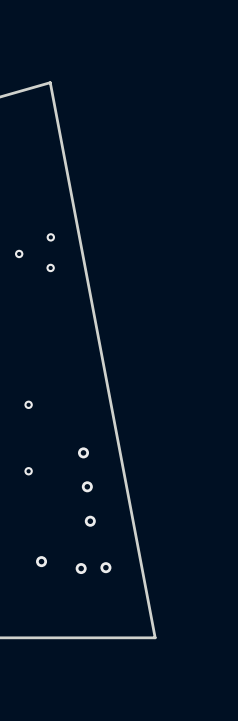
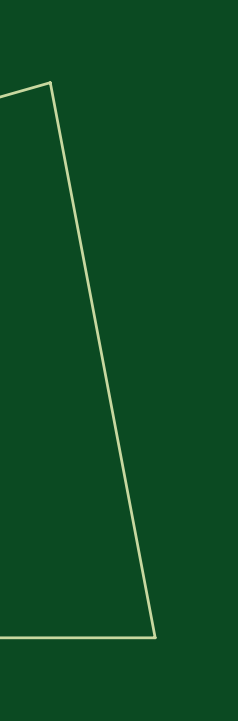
via: (50, 237) -> none
via: (19, 253) -> none
via: (50, 267) -> none
via: (28, 404) -> none
via: (83, 452) -> none
via: (28, 471) -> none
via: (87, 486) -> none
via: (90, 521) -> none
via: (41, 561) -> none
via: (105, 567) -> none
via: (81, 568) -> none

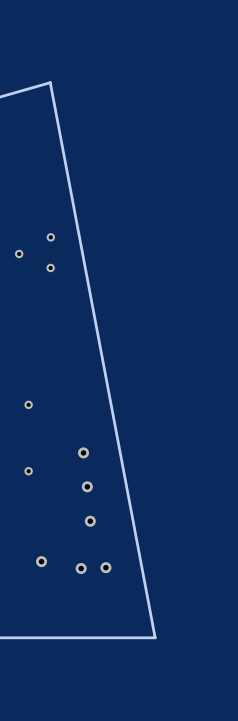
via: none -> (50, 237)
via: none -> (19, 253)
via: none -> (50, 267)
via: none -> (28, 404)
via: none -> (83, 452)
via: none -> (28, 471)
via: none -> (87, 486)
via: none -> (90, 521)
via: none -> (41, 561)
via: none -> (105, 567)
via: none -> (81, 568)

